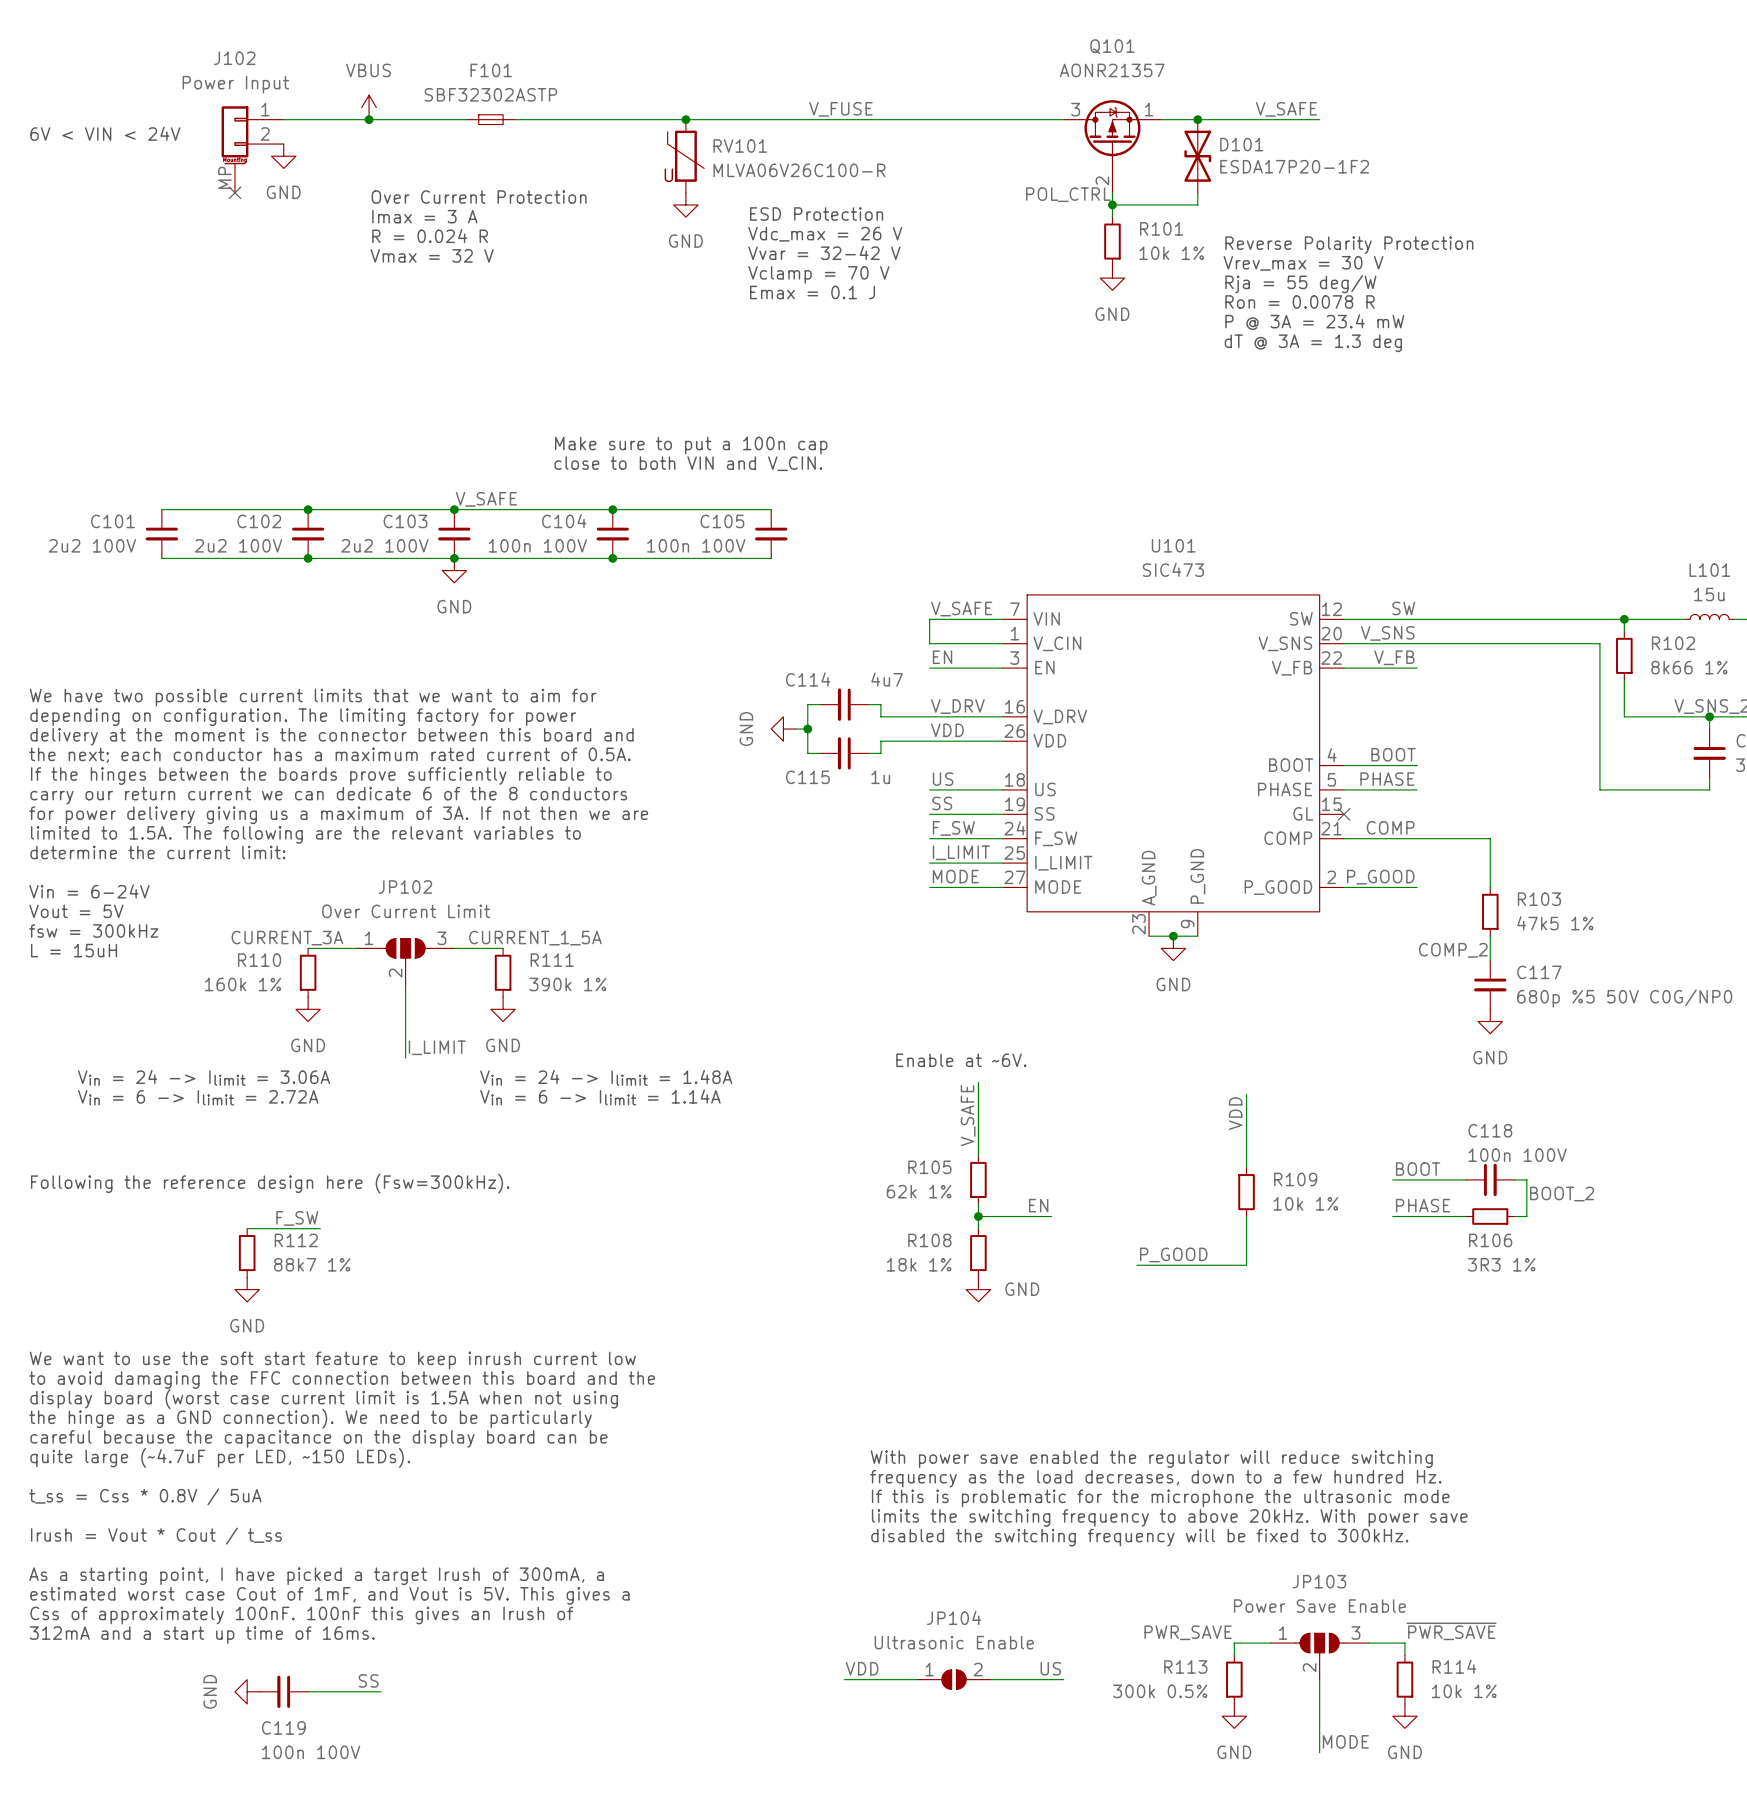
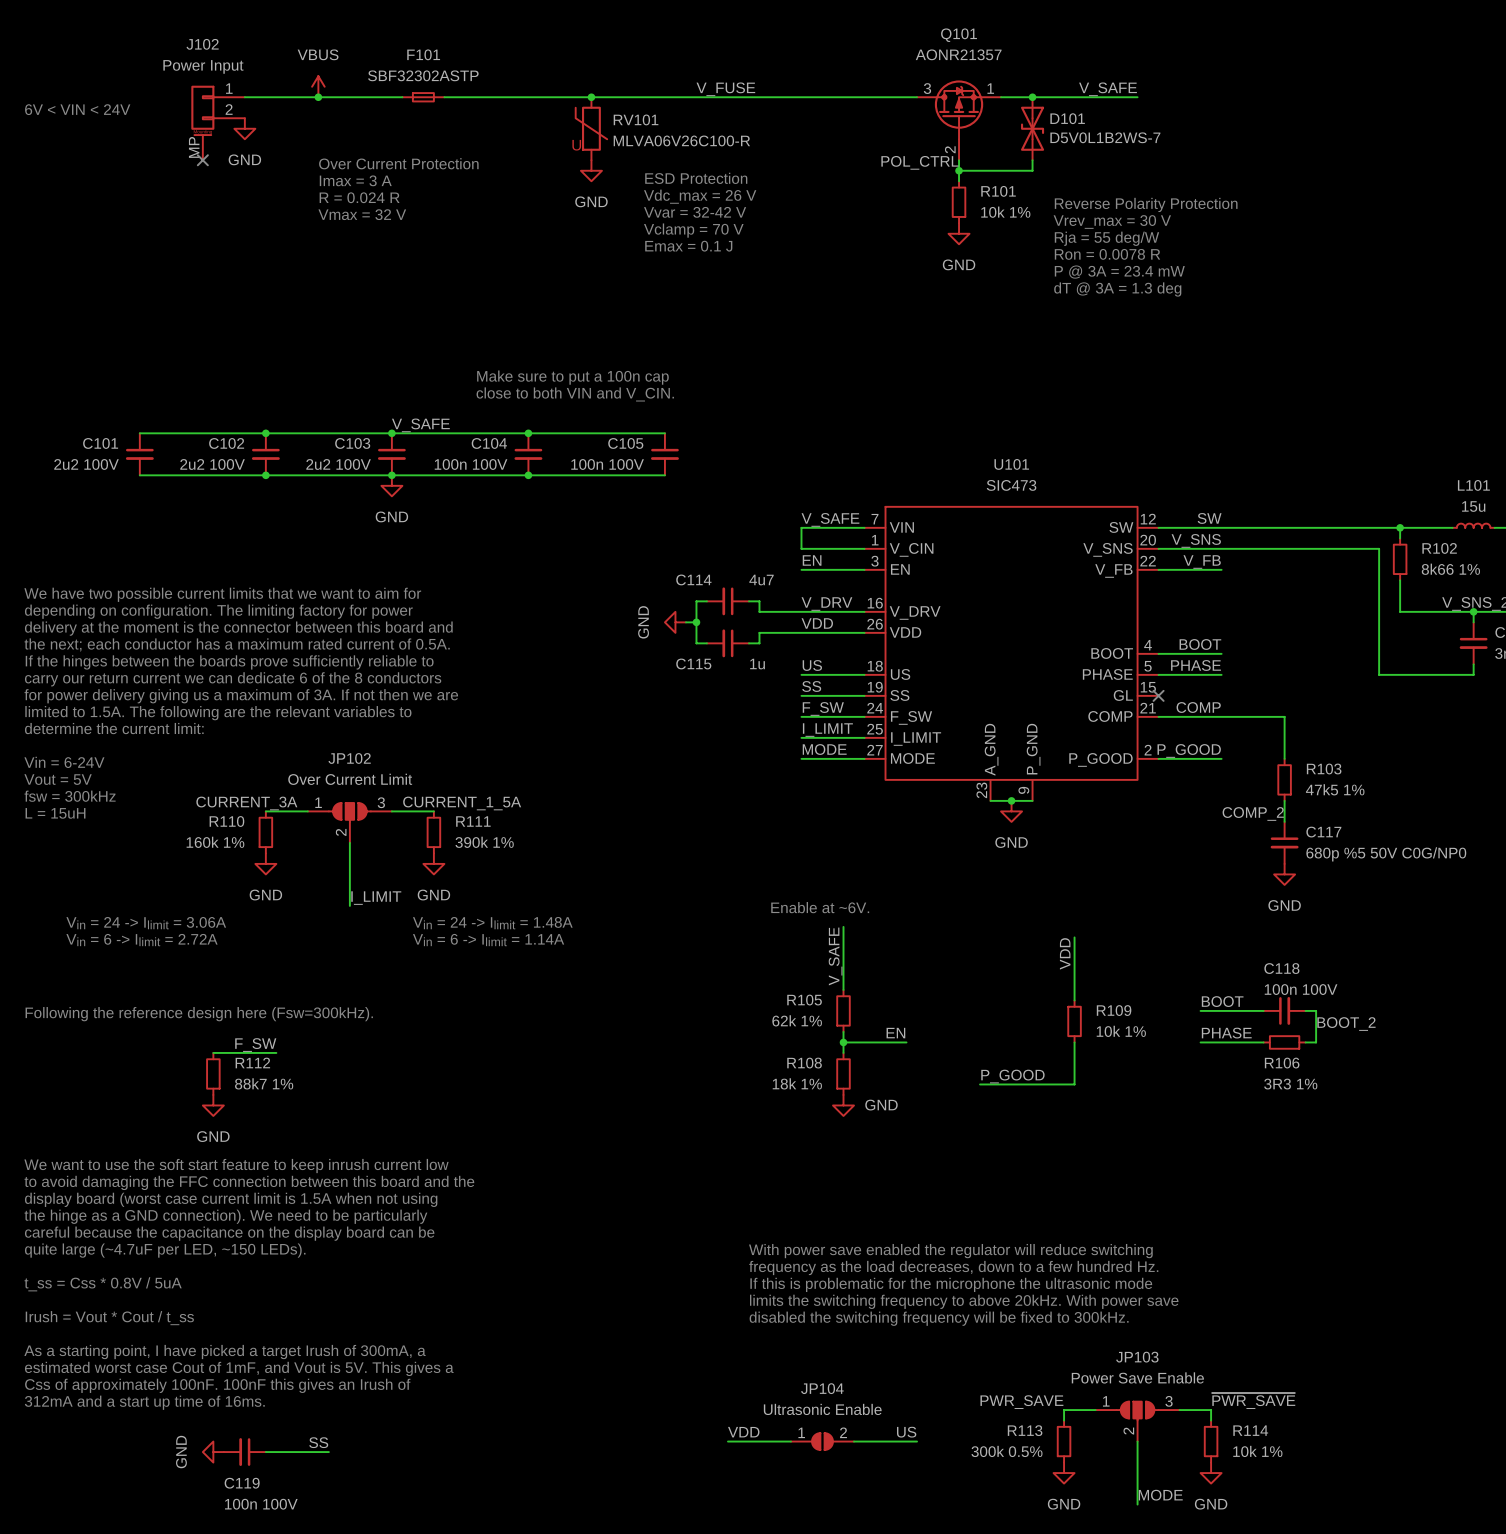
D101 value: ESDA17P20-1F2 (1294, 166) -> D5V0L1B2WS-7 (1105, 137)

